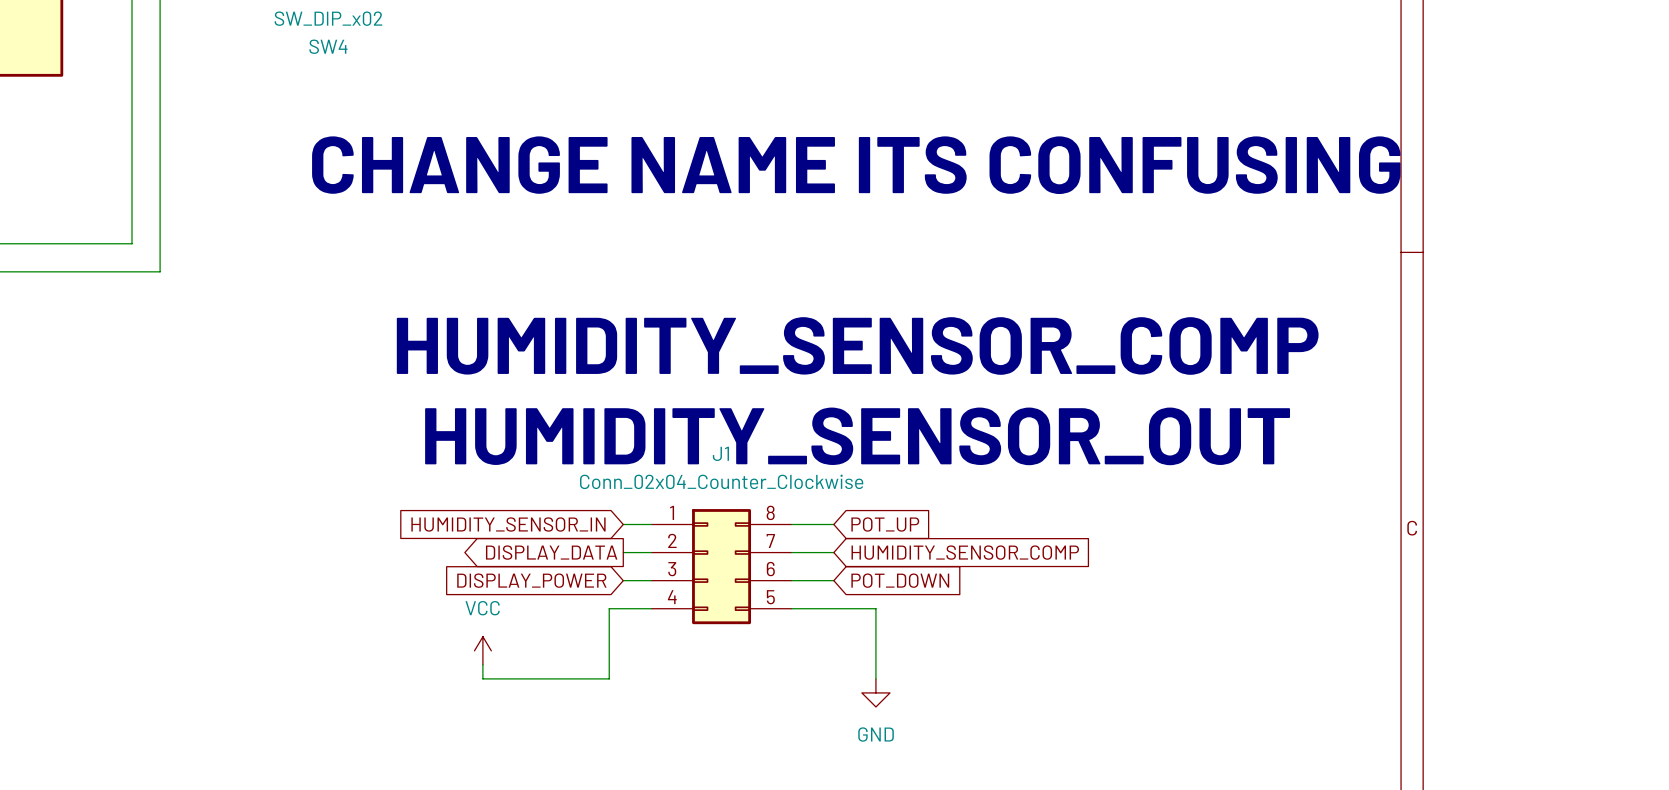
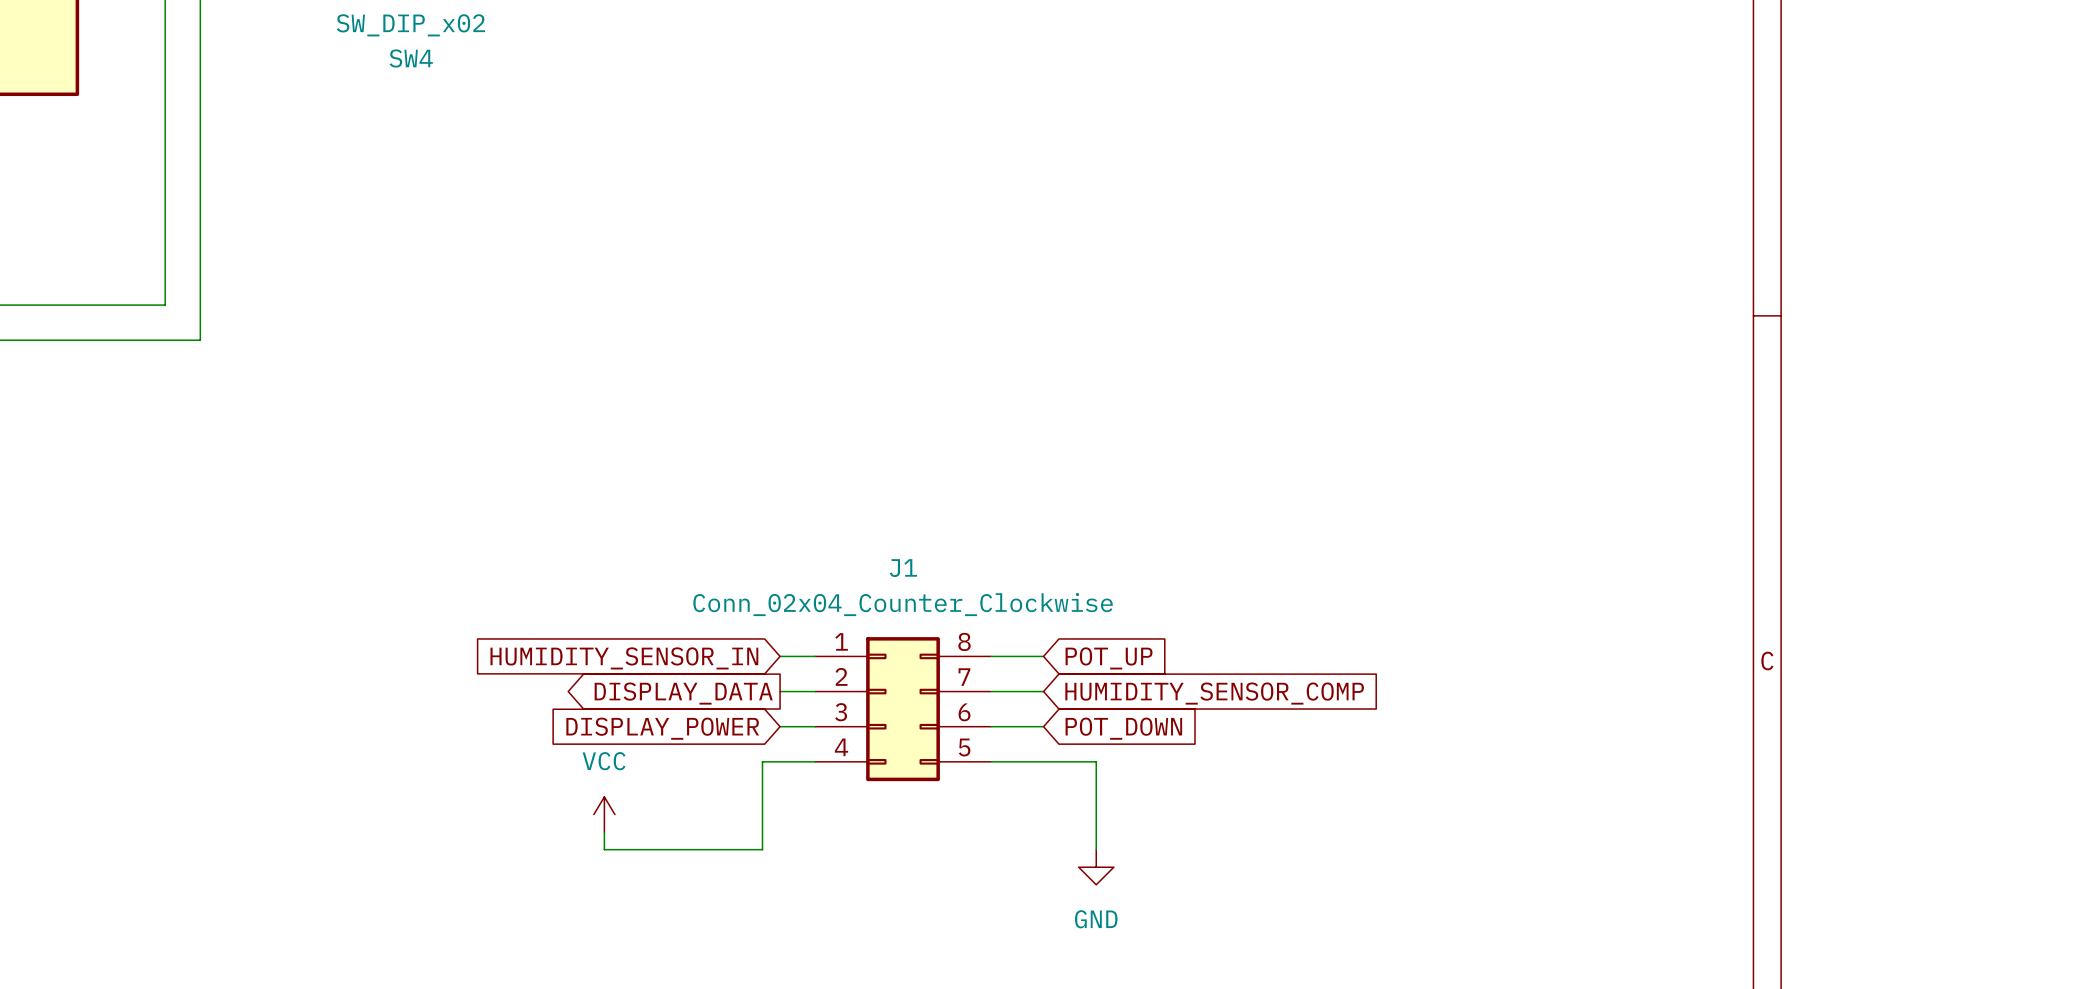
text: CHANGE NAME ITS CONFUSING (856, 165) -> none
text: HUMIDITY_SENSOR_COMP (857, 345) -> none
text: HUMIDITY_SENSOR_OUT (857, 436) -> none

